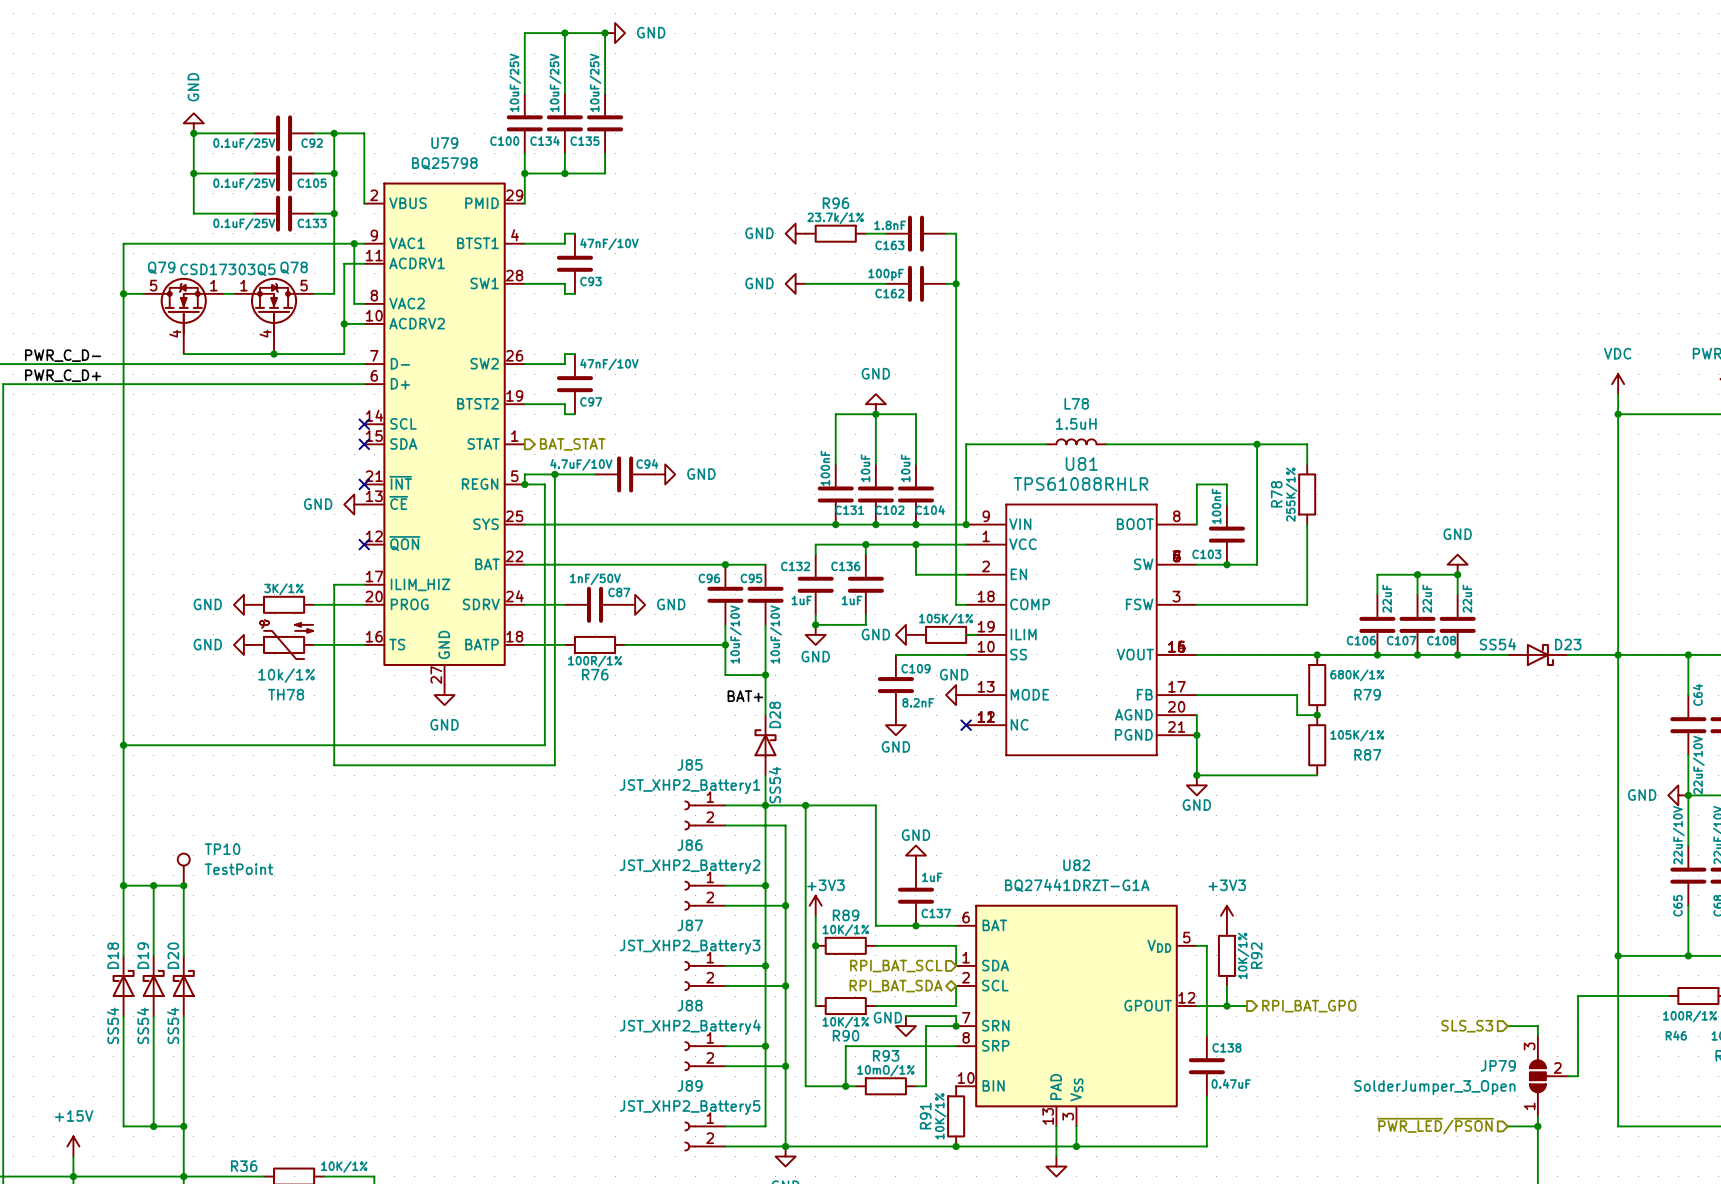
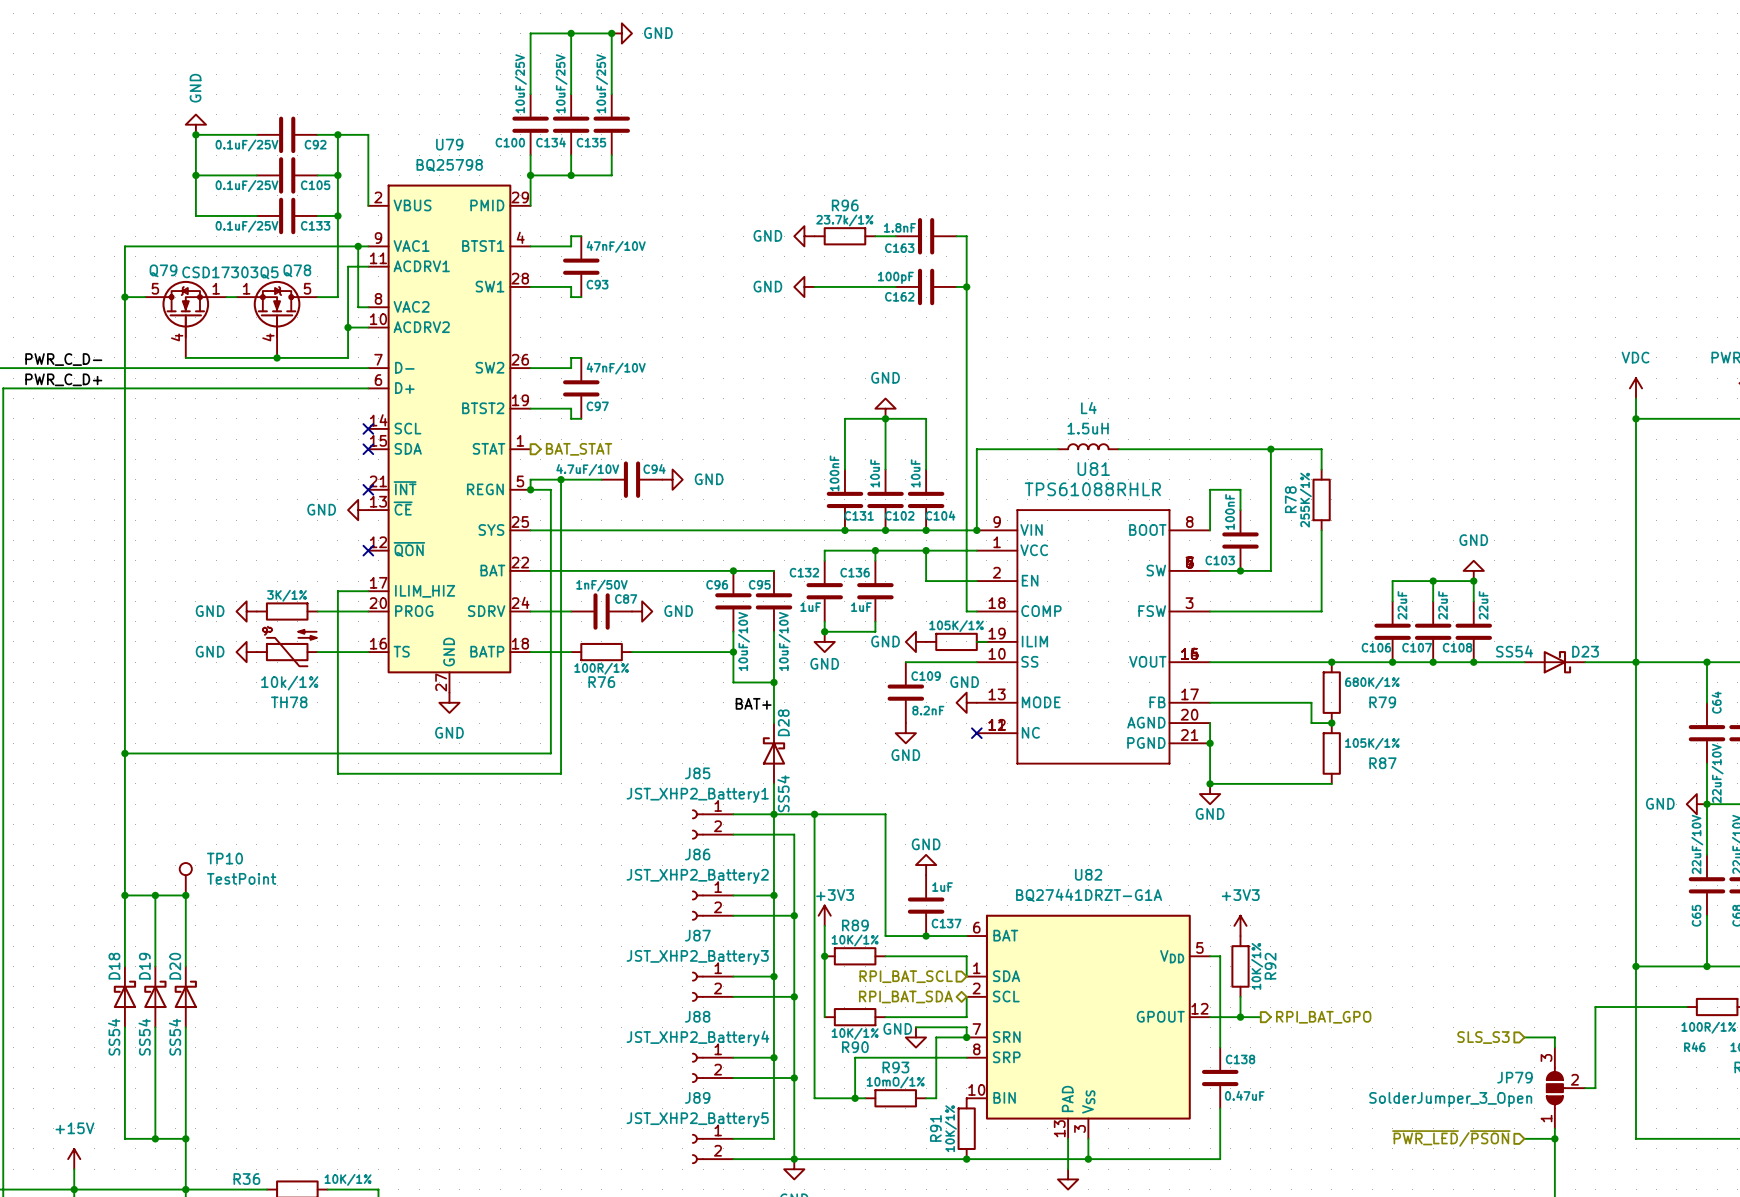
L78 name: L78 (1076, 403) -> L4 (1088, 408)

